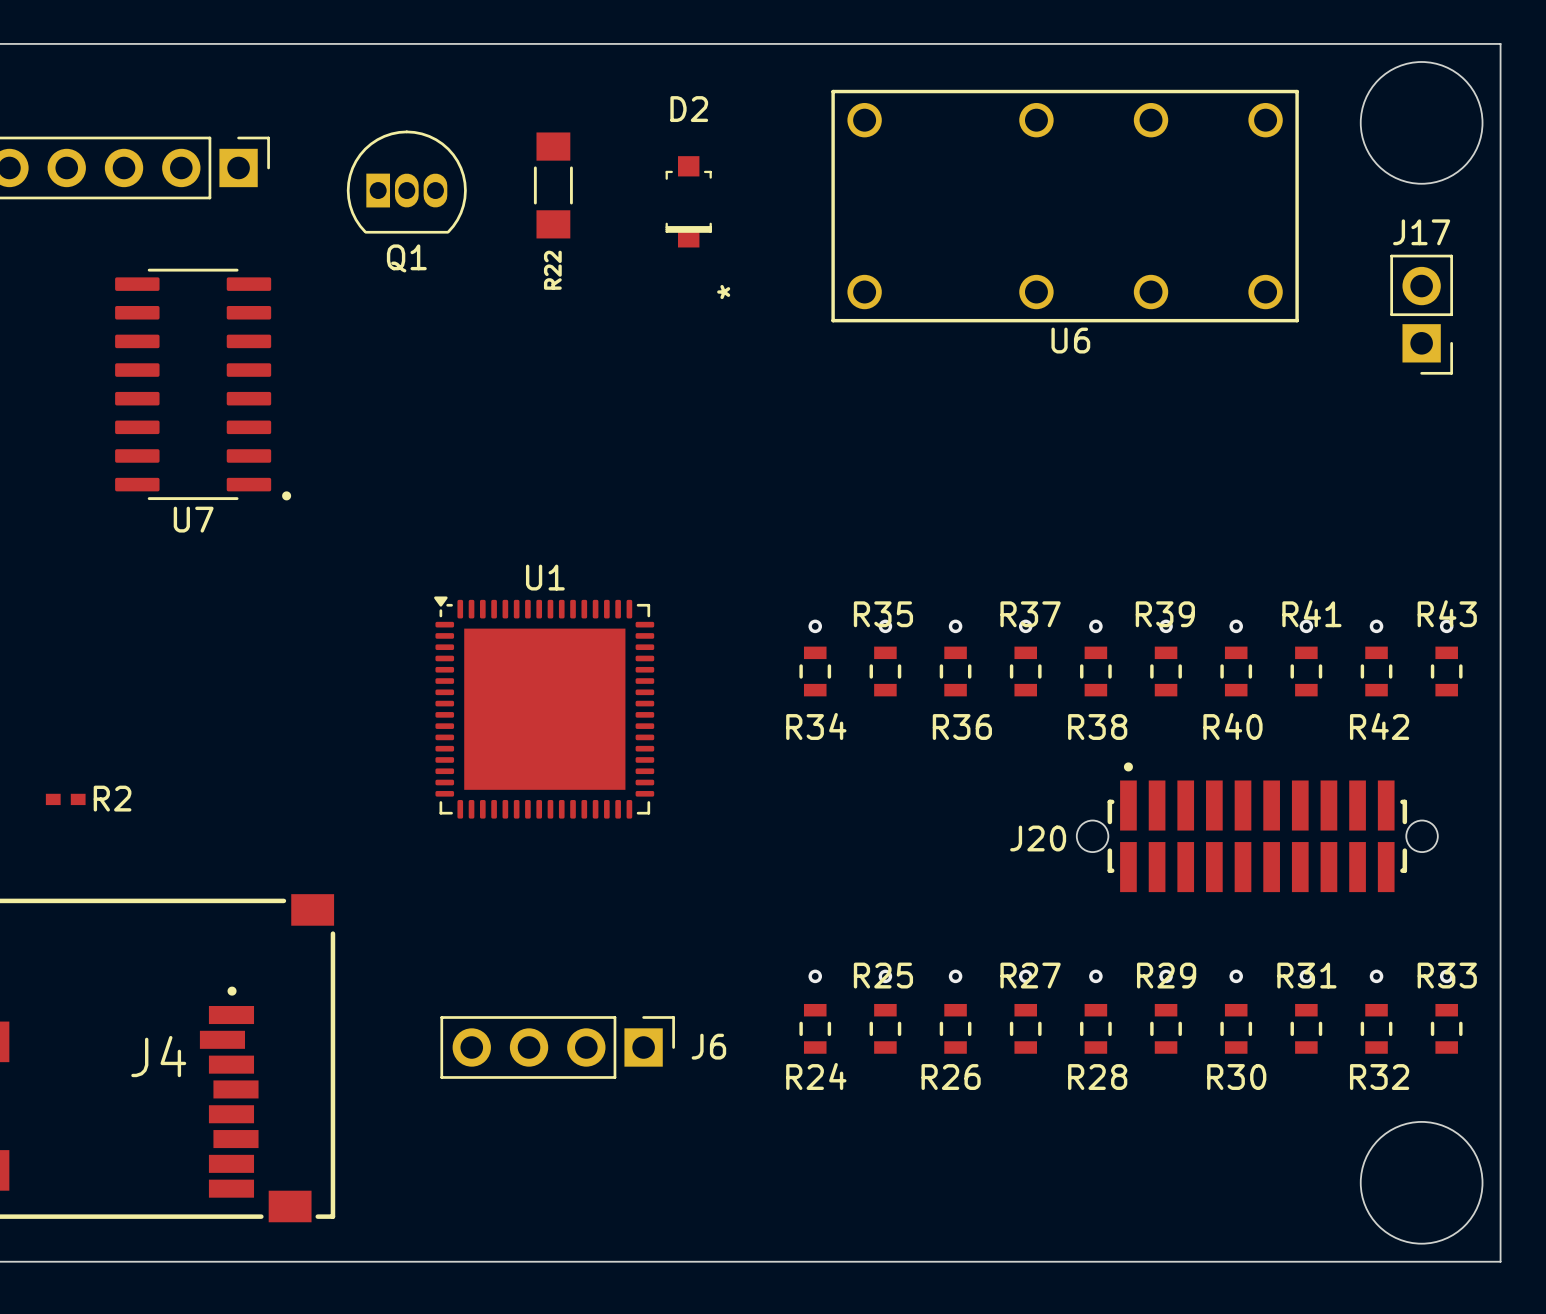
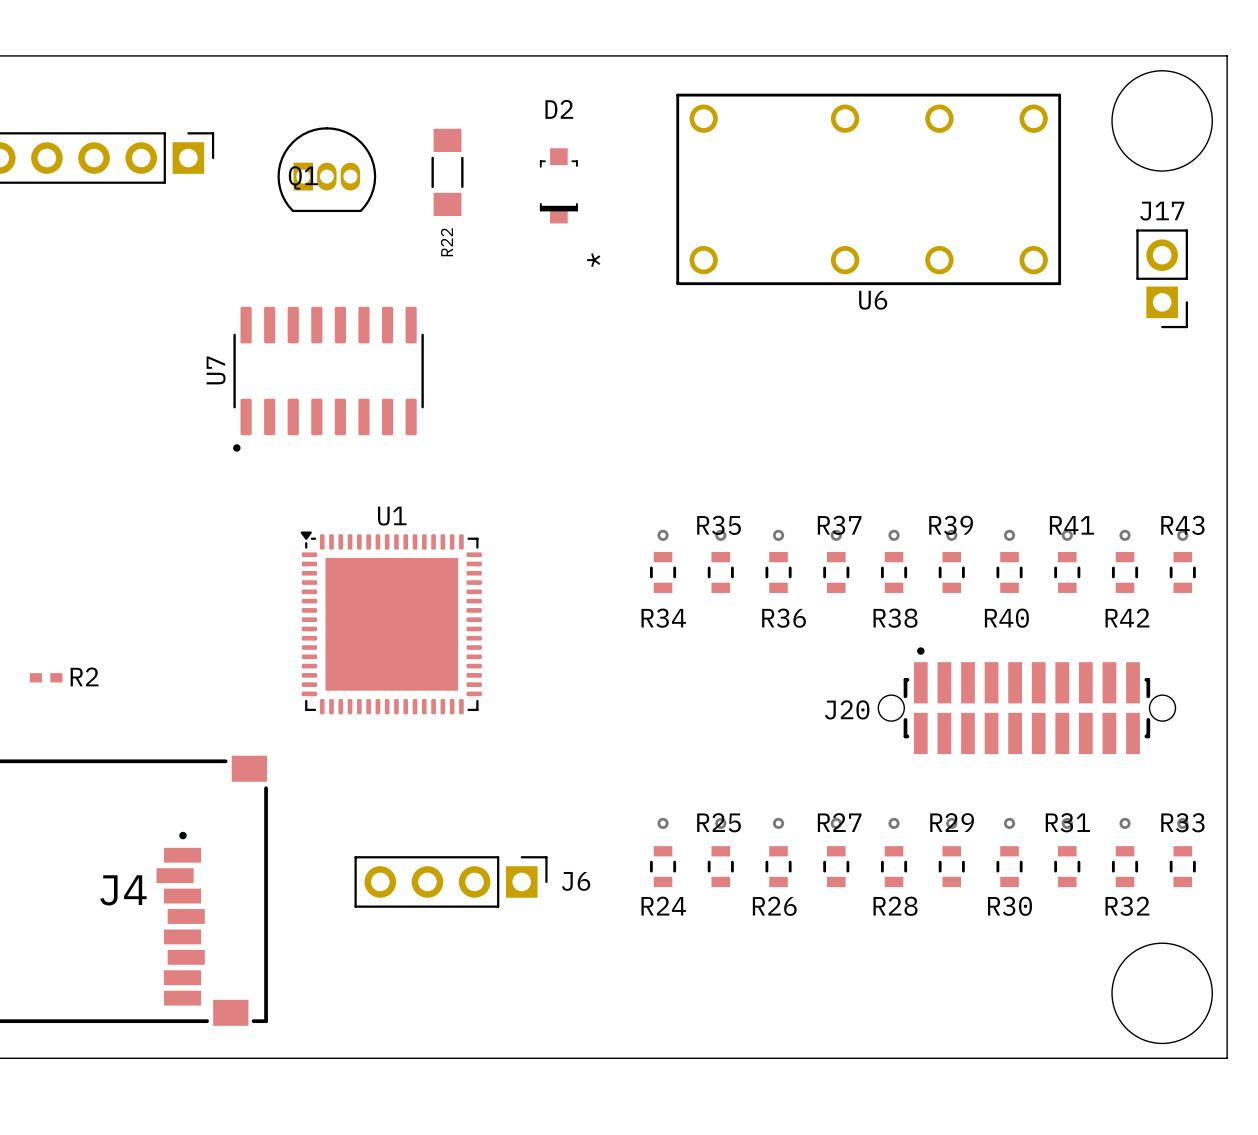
Q1 name position: Q1 (406, 258) -> Q1 (303, 177)
U7 rotation: 0° (203, 384) -> 90° clockwise (328, 379)
U7 position: (203, 384) -> (328, 379)
U1 position: (544, 707) -> (391, 622)

